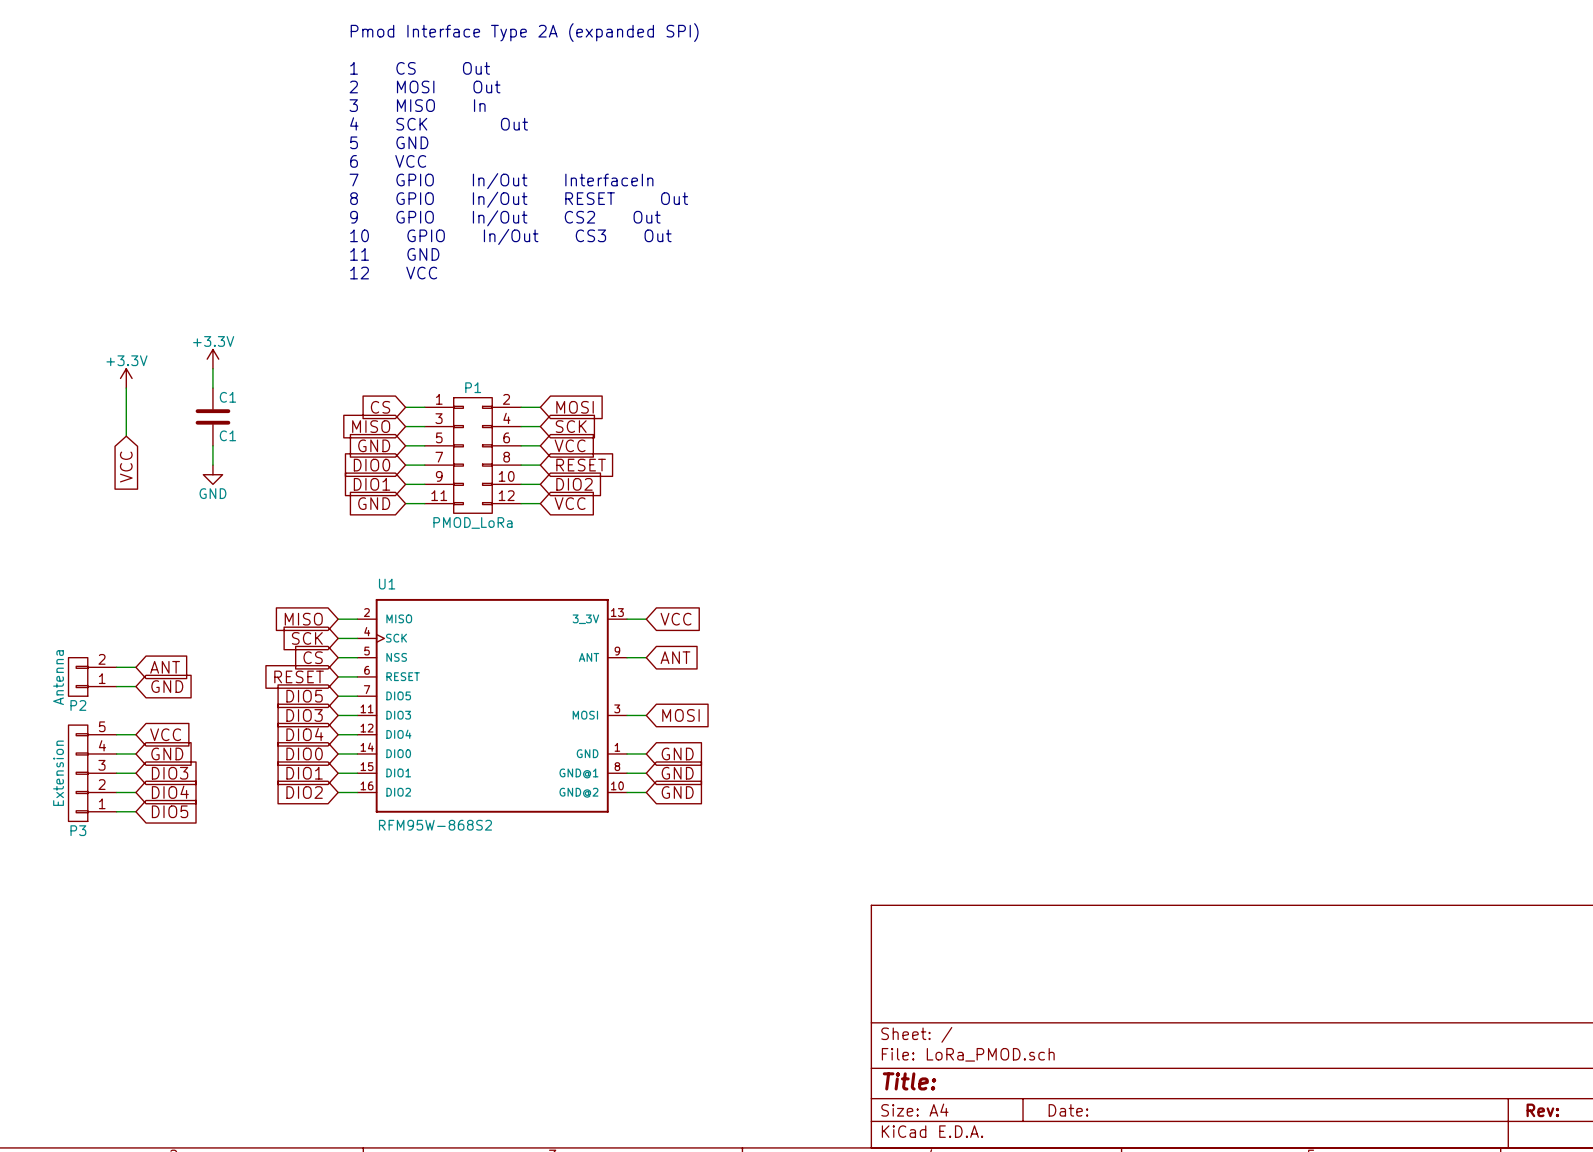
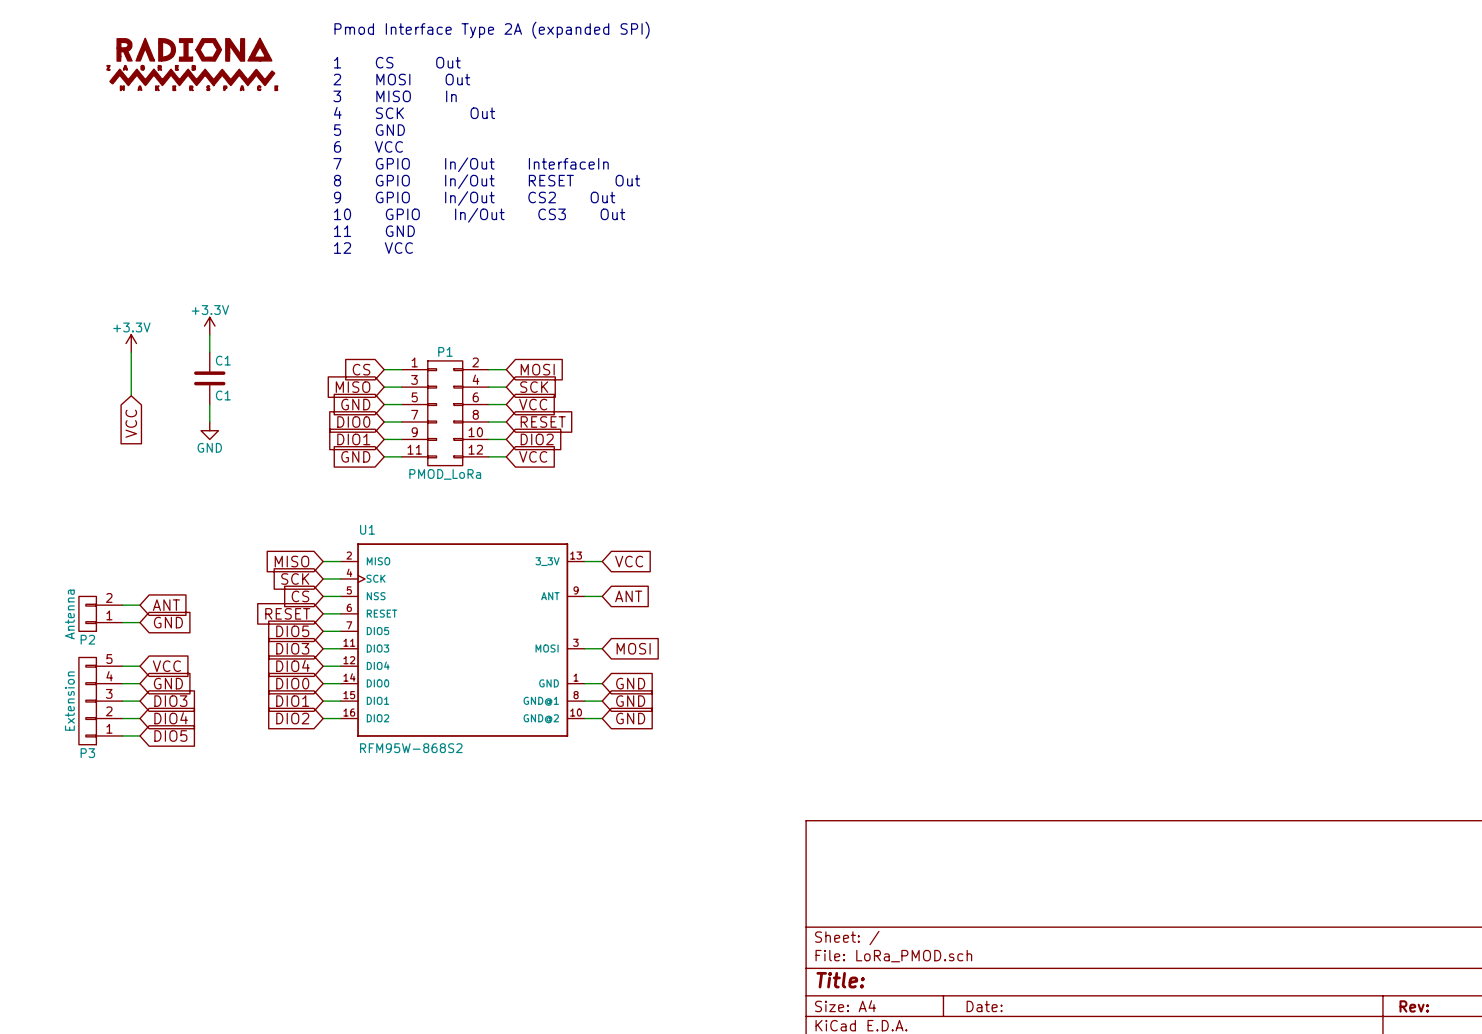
power symbol: none -> (192, 64)

